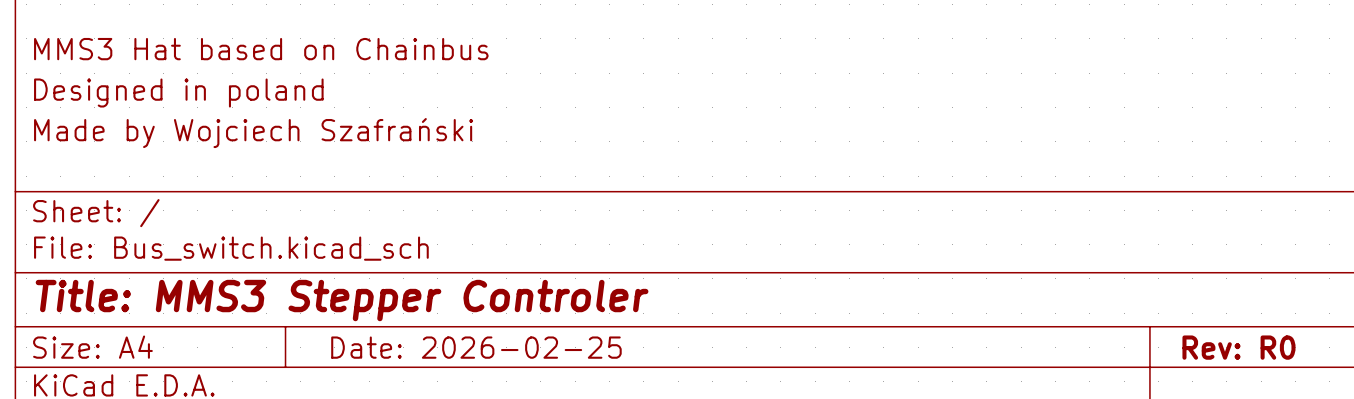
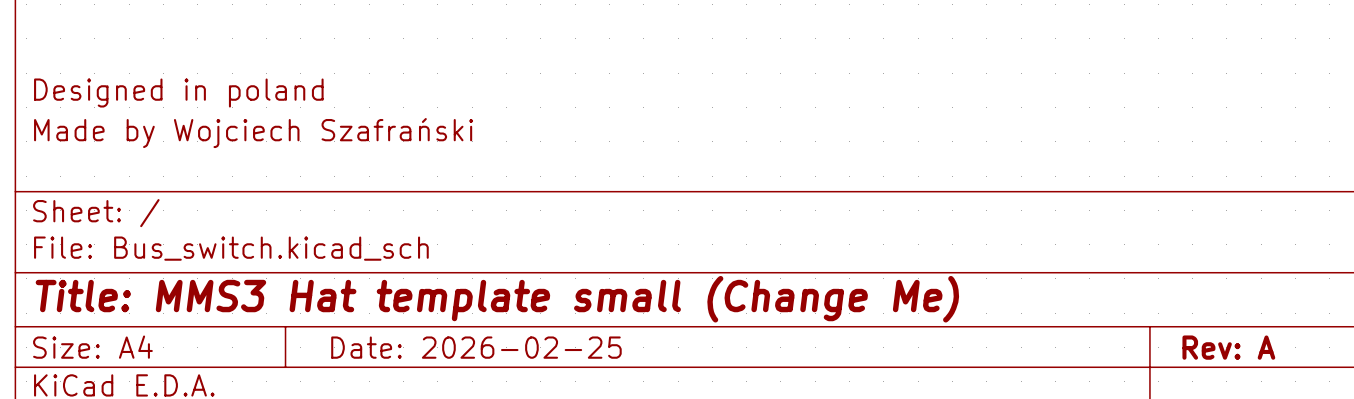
title block: MMS3 Hat based on Chainbus (261, 49) -> none
title block: Title: MMS3 Stepper Controler (342, 300) -> Title: MMS3 Hat template small (Change Me) (497, 299)
title block: Rev: R0 (1238, 347) -> Rev: A (1228, 347)

